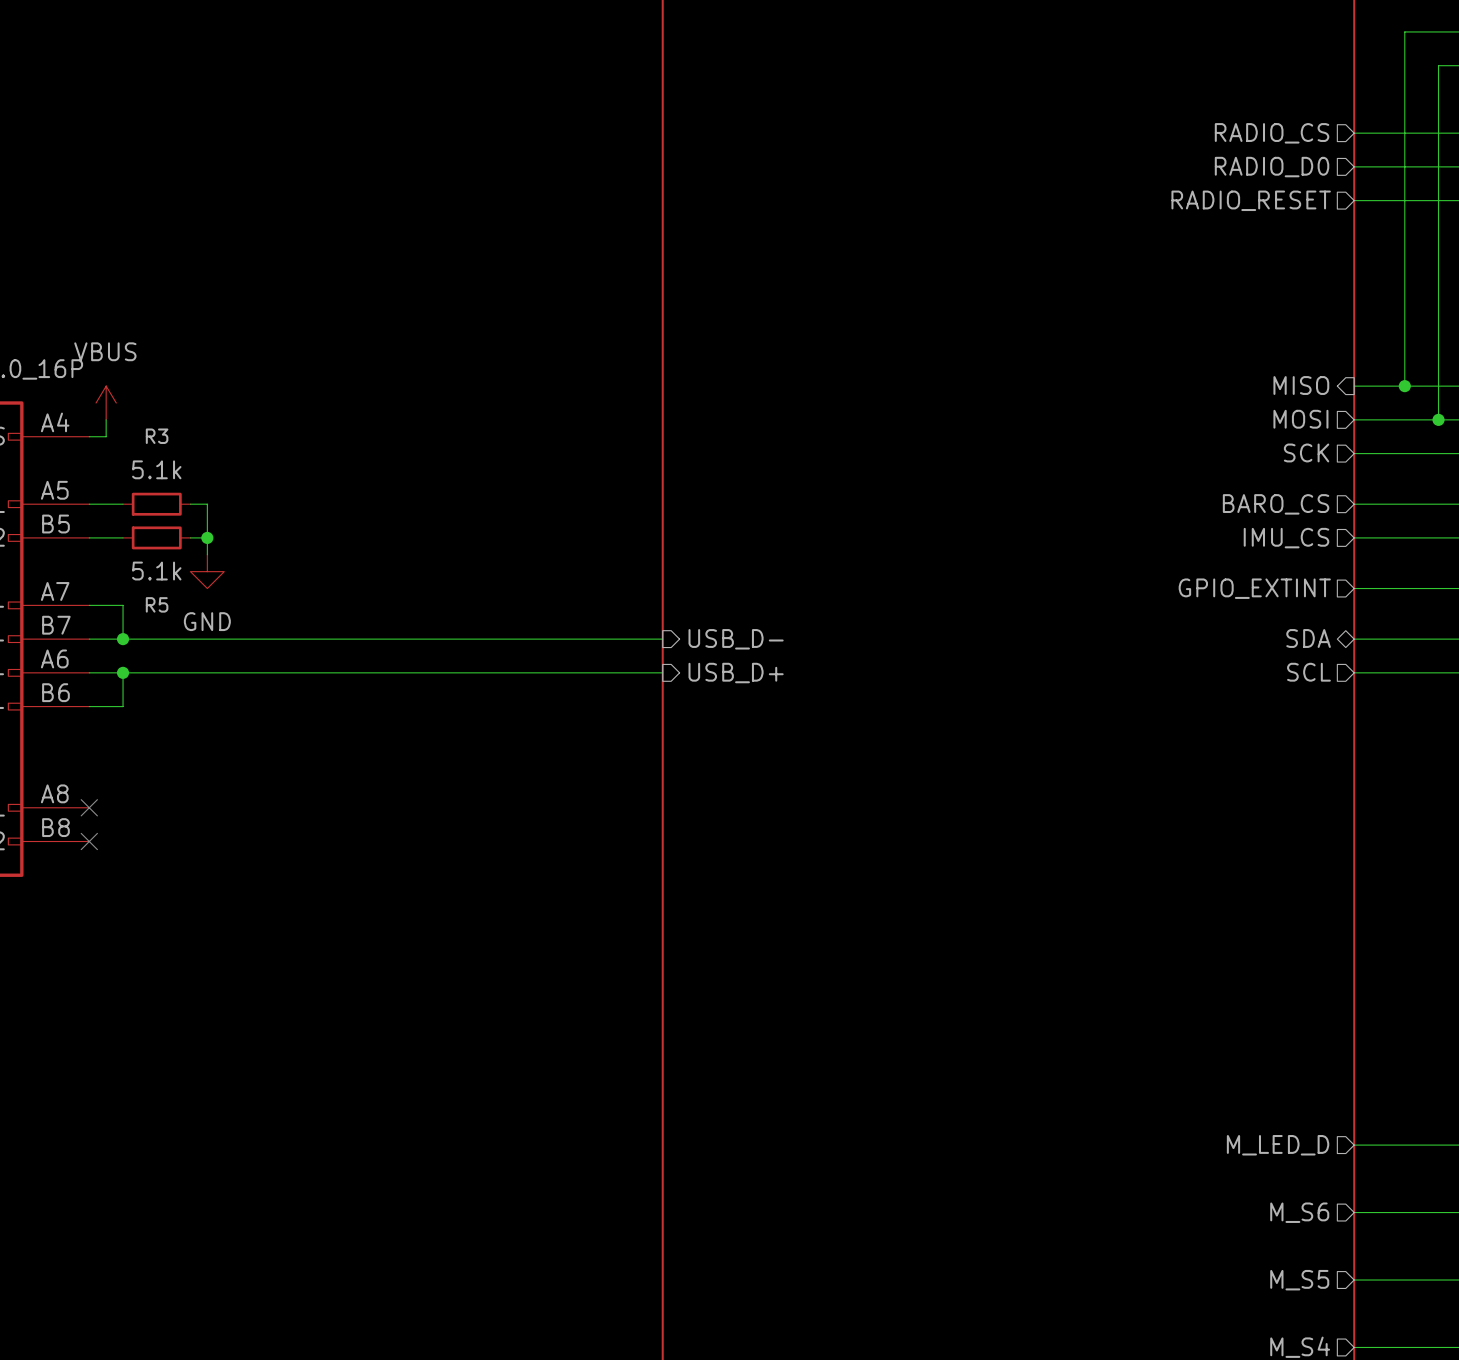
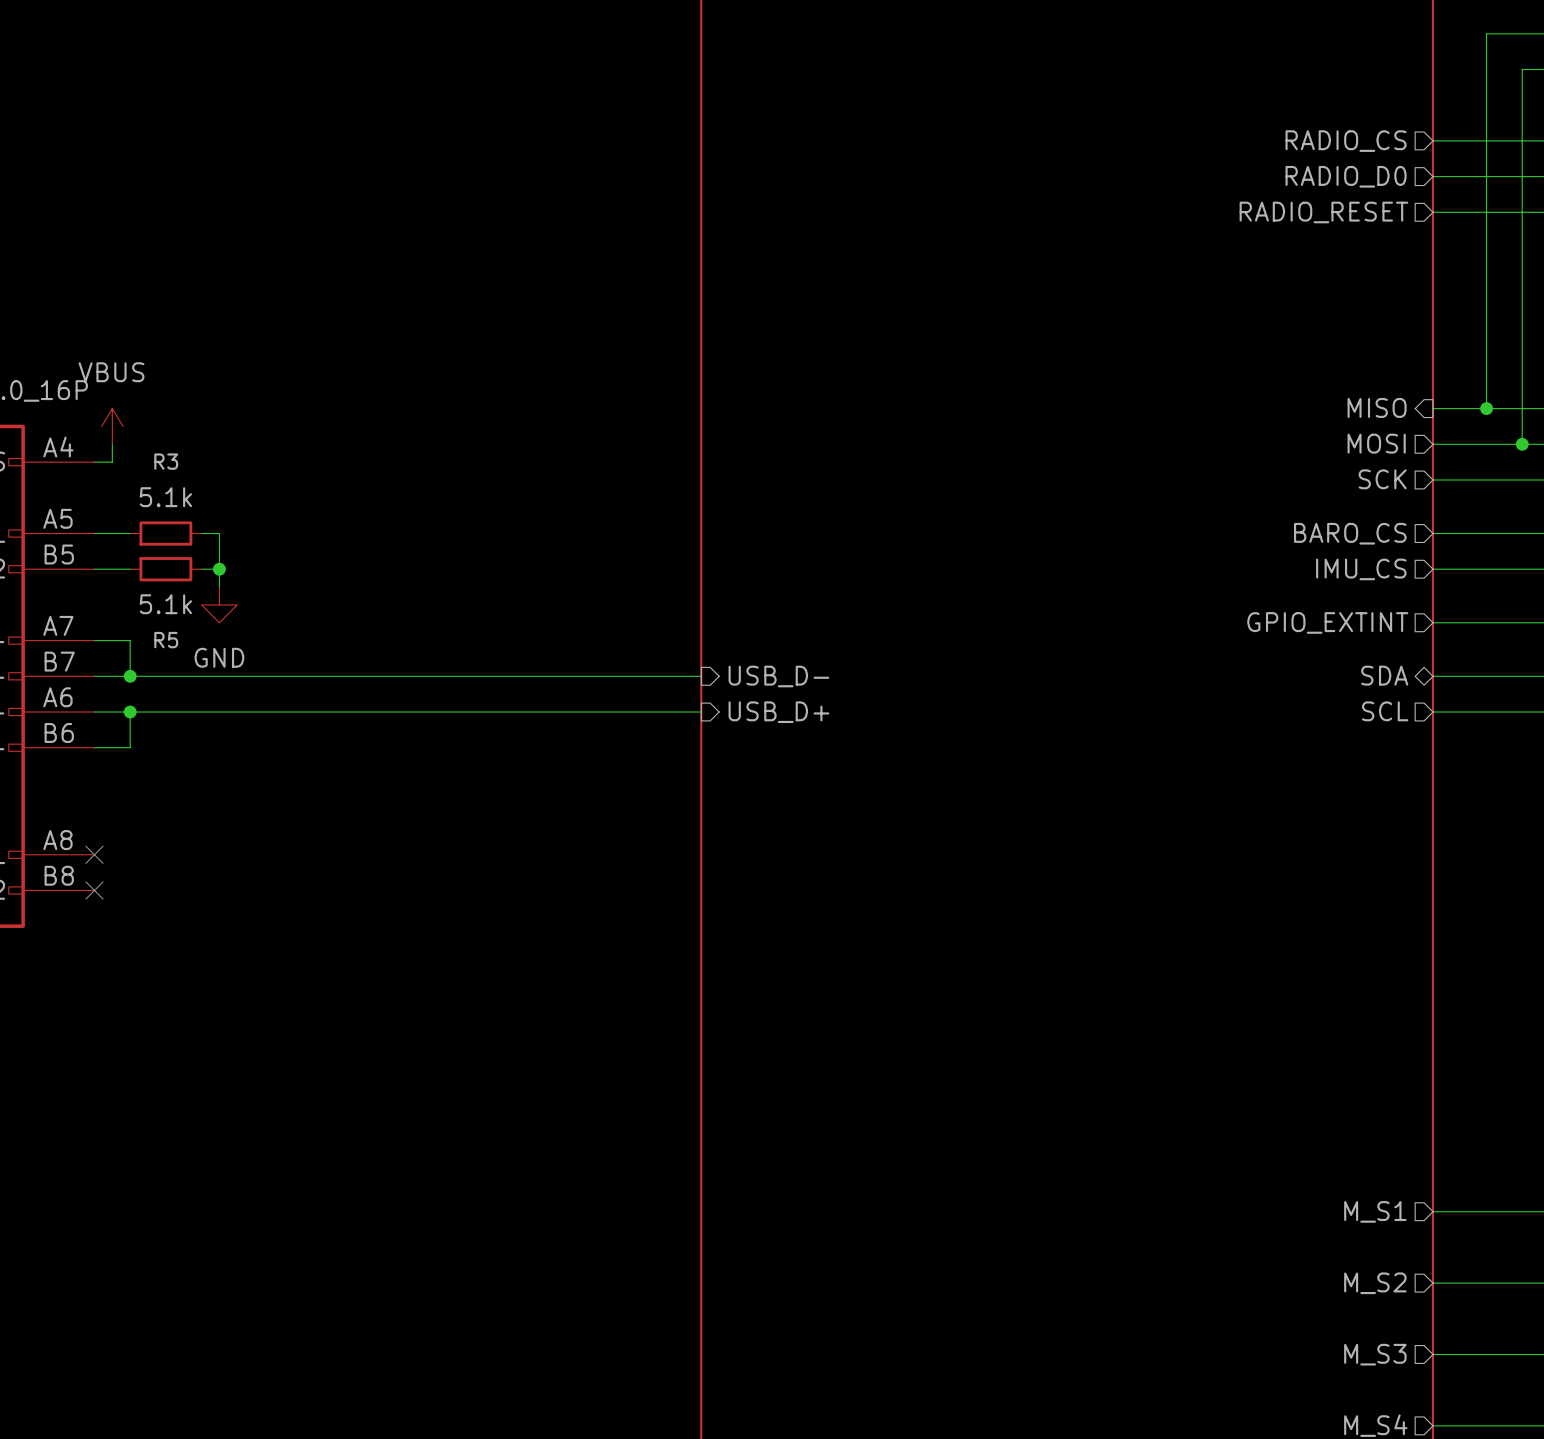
sheet pin: M_LED_D (1278, 1145) -> M_S1 (1375, 1211)
sheet pin: M_S6 (1299, 1212) -> M_S2 (1375, 1283)
sheet pin: M_S5 (1299, 1280) -> M_S3 (1375, 1354)

